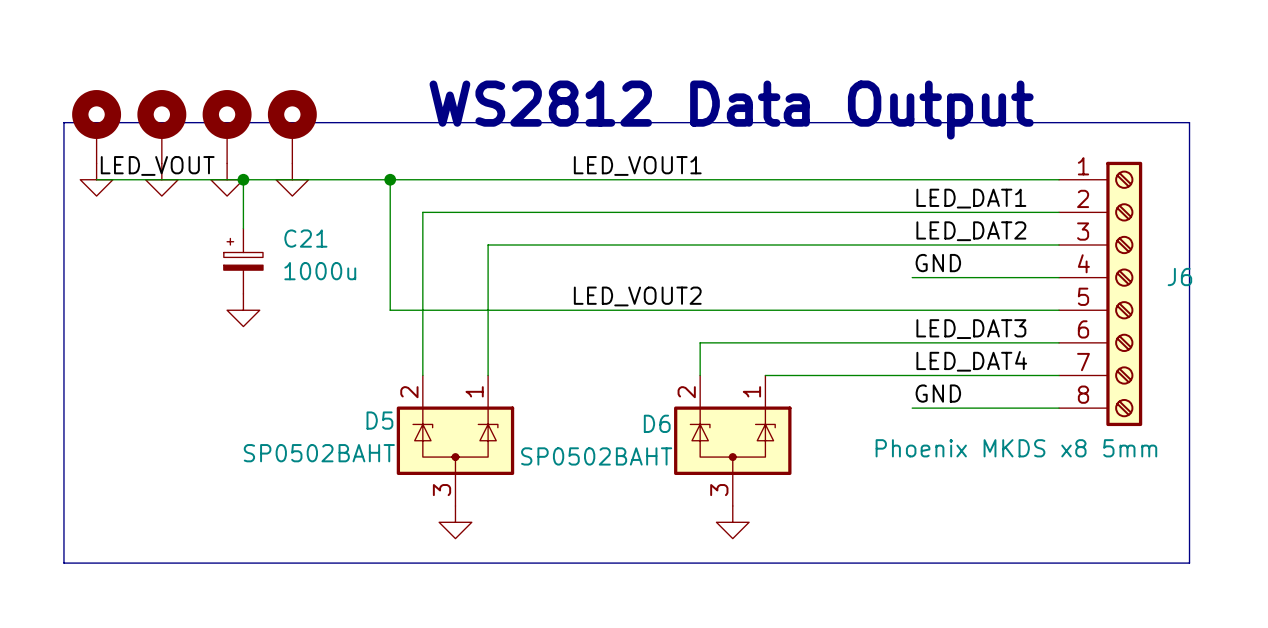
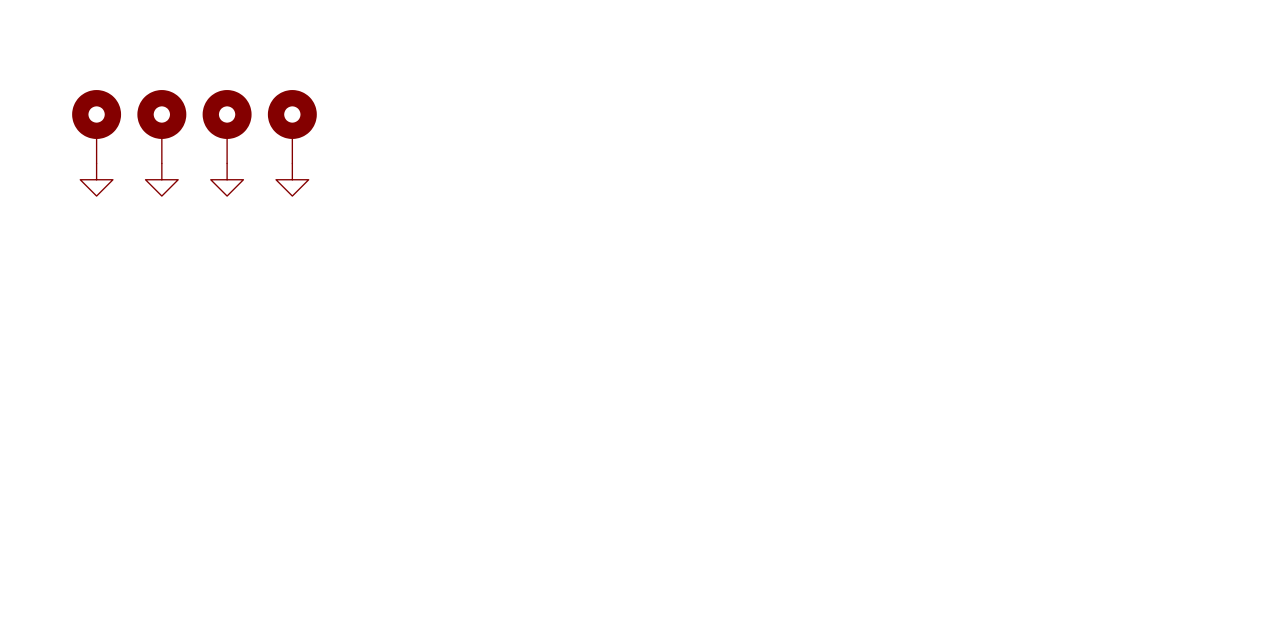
text: WS2812 Data Output (731, 110) -> none
line: (63, 122) (1189, 122) (1189, 563) (63, 563) (63, 122) -> none
label: LED_VOUT (157, 165) -> none
label: LED_VOUT1 (637, 165) -> none
wire: (96, 179) (1059, 179) -> none
wire: (243, 179) (243, 228) -> none
junction: (243, 179) -> none
wire: (390, 179) (390, 310) (1059, 310) -> none
junction: (390, 179) -> none
label: LED_DAT1 (971, 198) -> none
wire: (1059, 212) (422, 212) (422, 375) -> none
label: LED_DAT2 (971, 231) -> none
wire: (1059, 244) (488, 244) (488, 375) -> none
C21: 1000u (243, 261) -> none
label: GND (938, 263) -> none
wire: (912, 277) (1059, 277) -> none
J6: Phoenix MKDS x8 5mm (1100, 293) -> none
label: LED_VOUT2 (637, 296) -> none
power symbol: (243, 310) -> none
label: LED_DAT3 (971, 329) -> none
wire: (1059, 342) (700, 342) (700, 375) -> none
label: LED_DAT4 (971, 361) -> none
wire: (765, 375) (1059, 375) -> none
label: GND (938, 393) -> none
wire: (912, 408) (1059, 408) -> none
D5: SP0502BAHT (455, 440) -> none
D6: SP0502BAHT (732, 440) -> none
power symbol: (455, 522) -> none
power symbol: (732, 522) -> none

